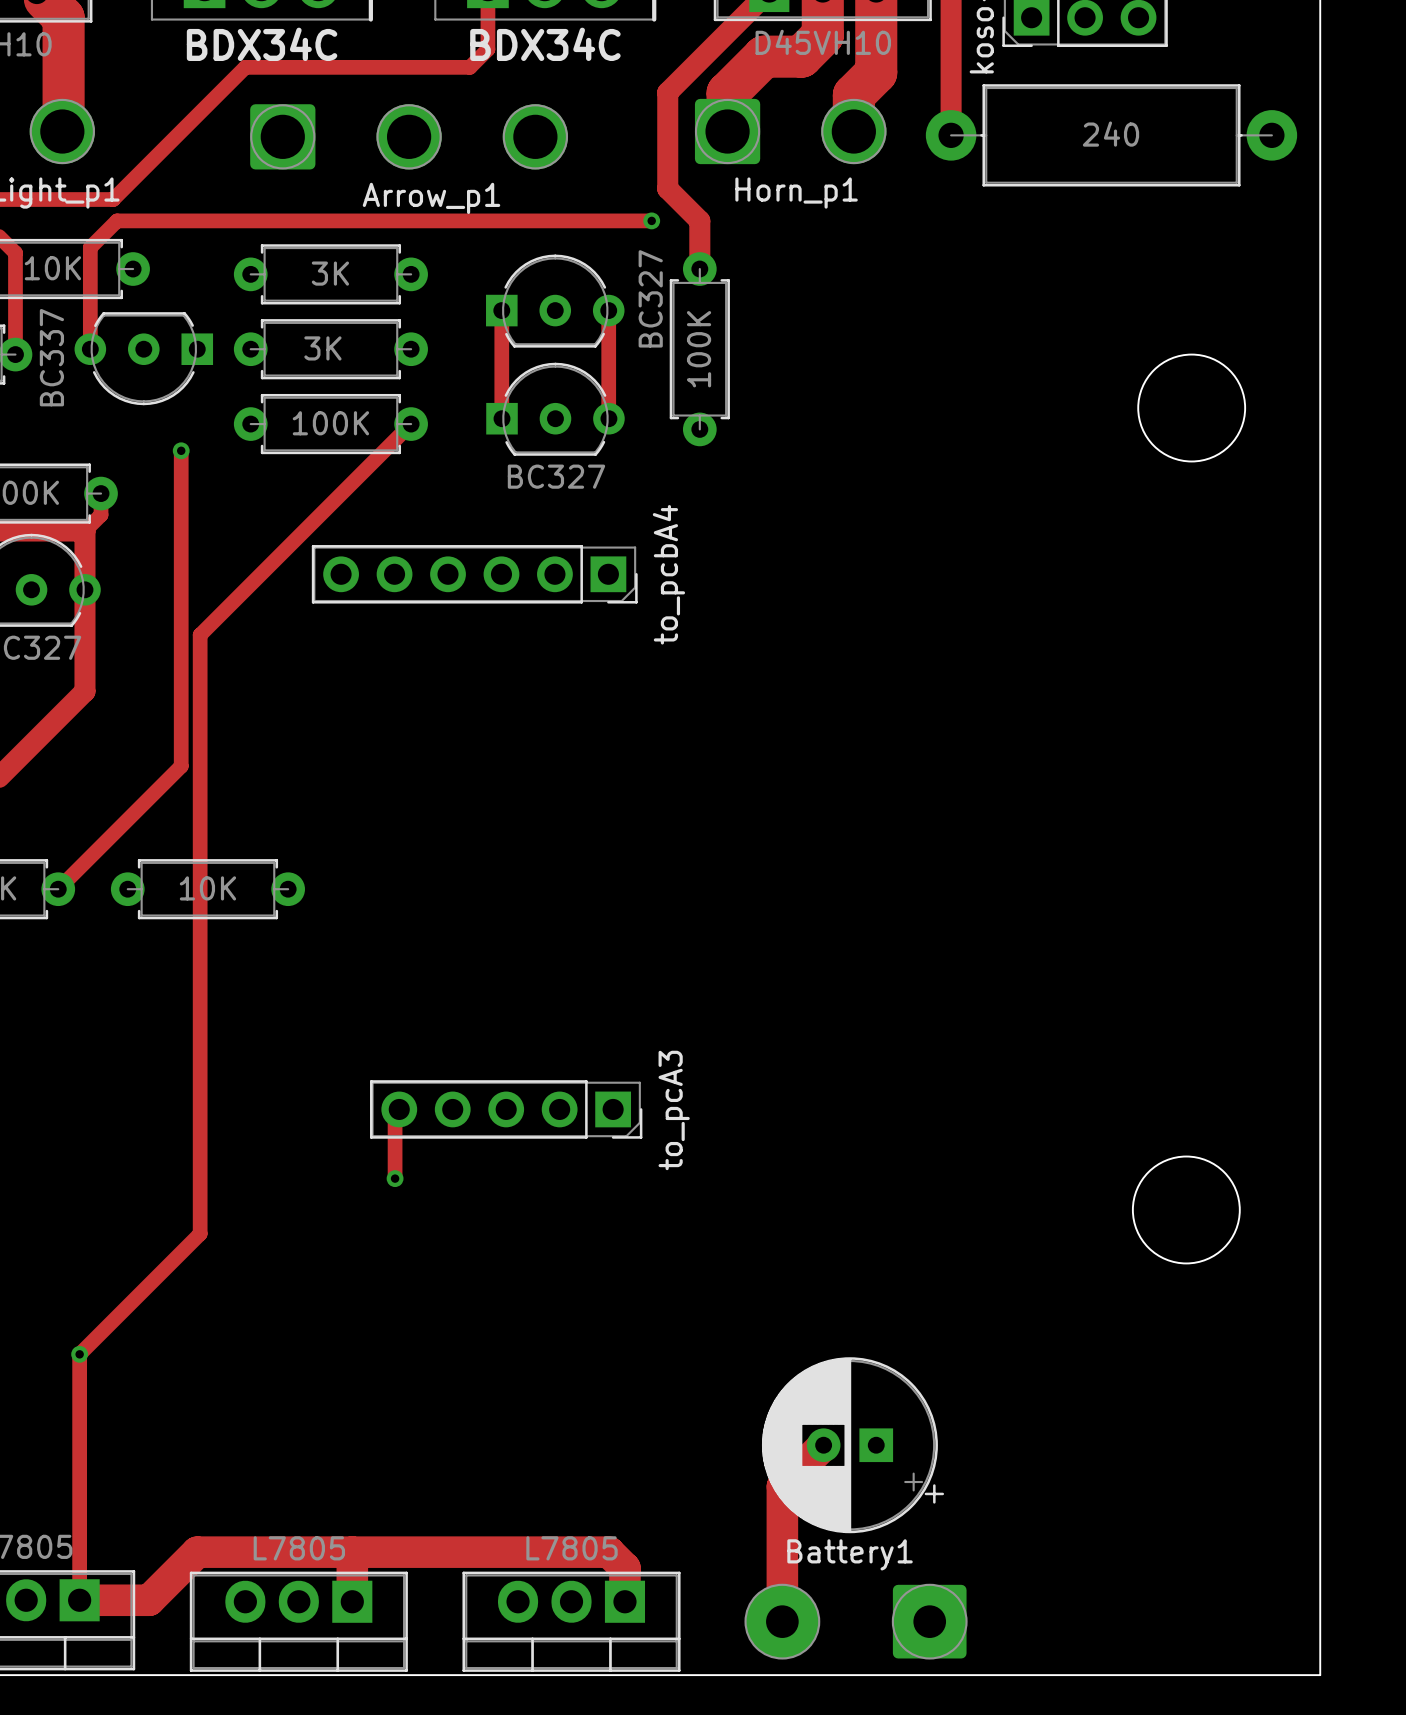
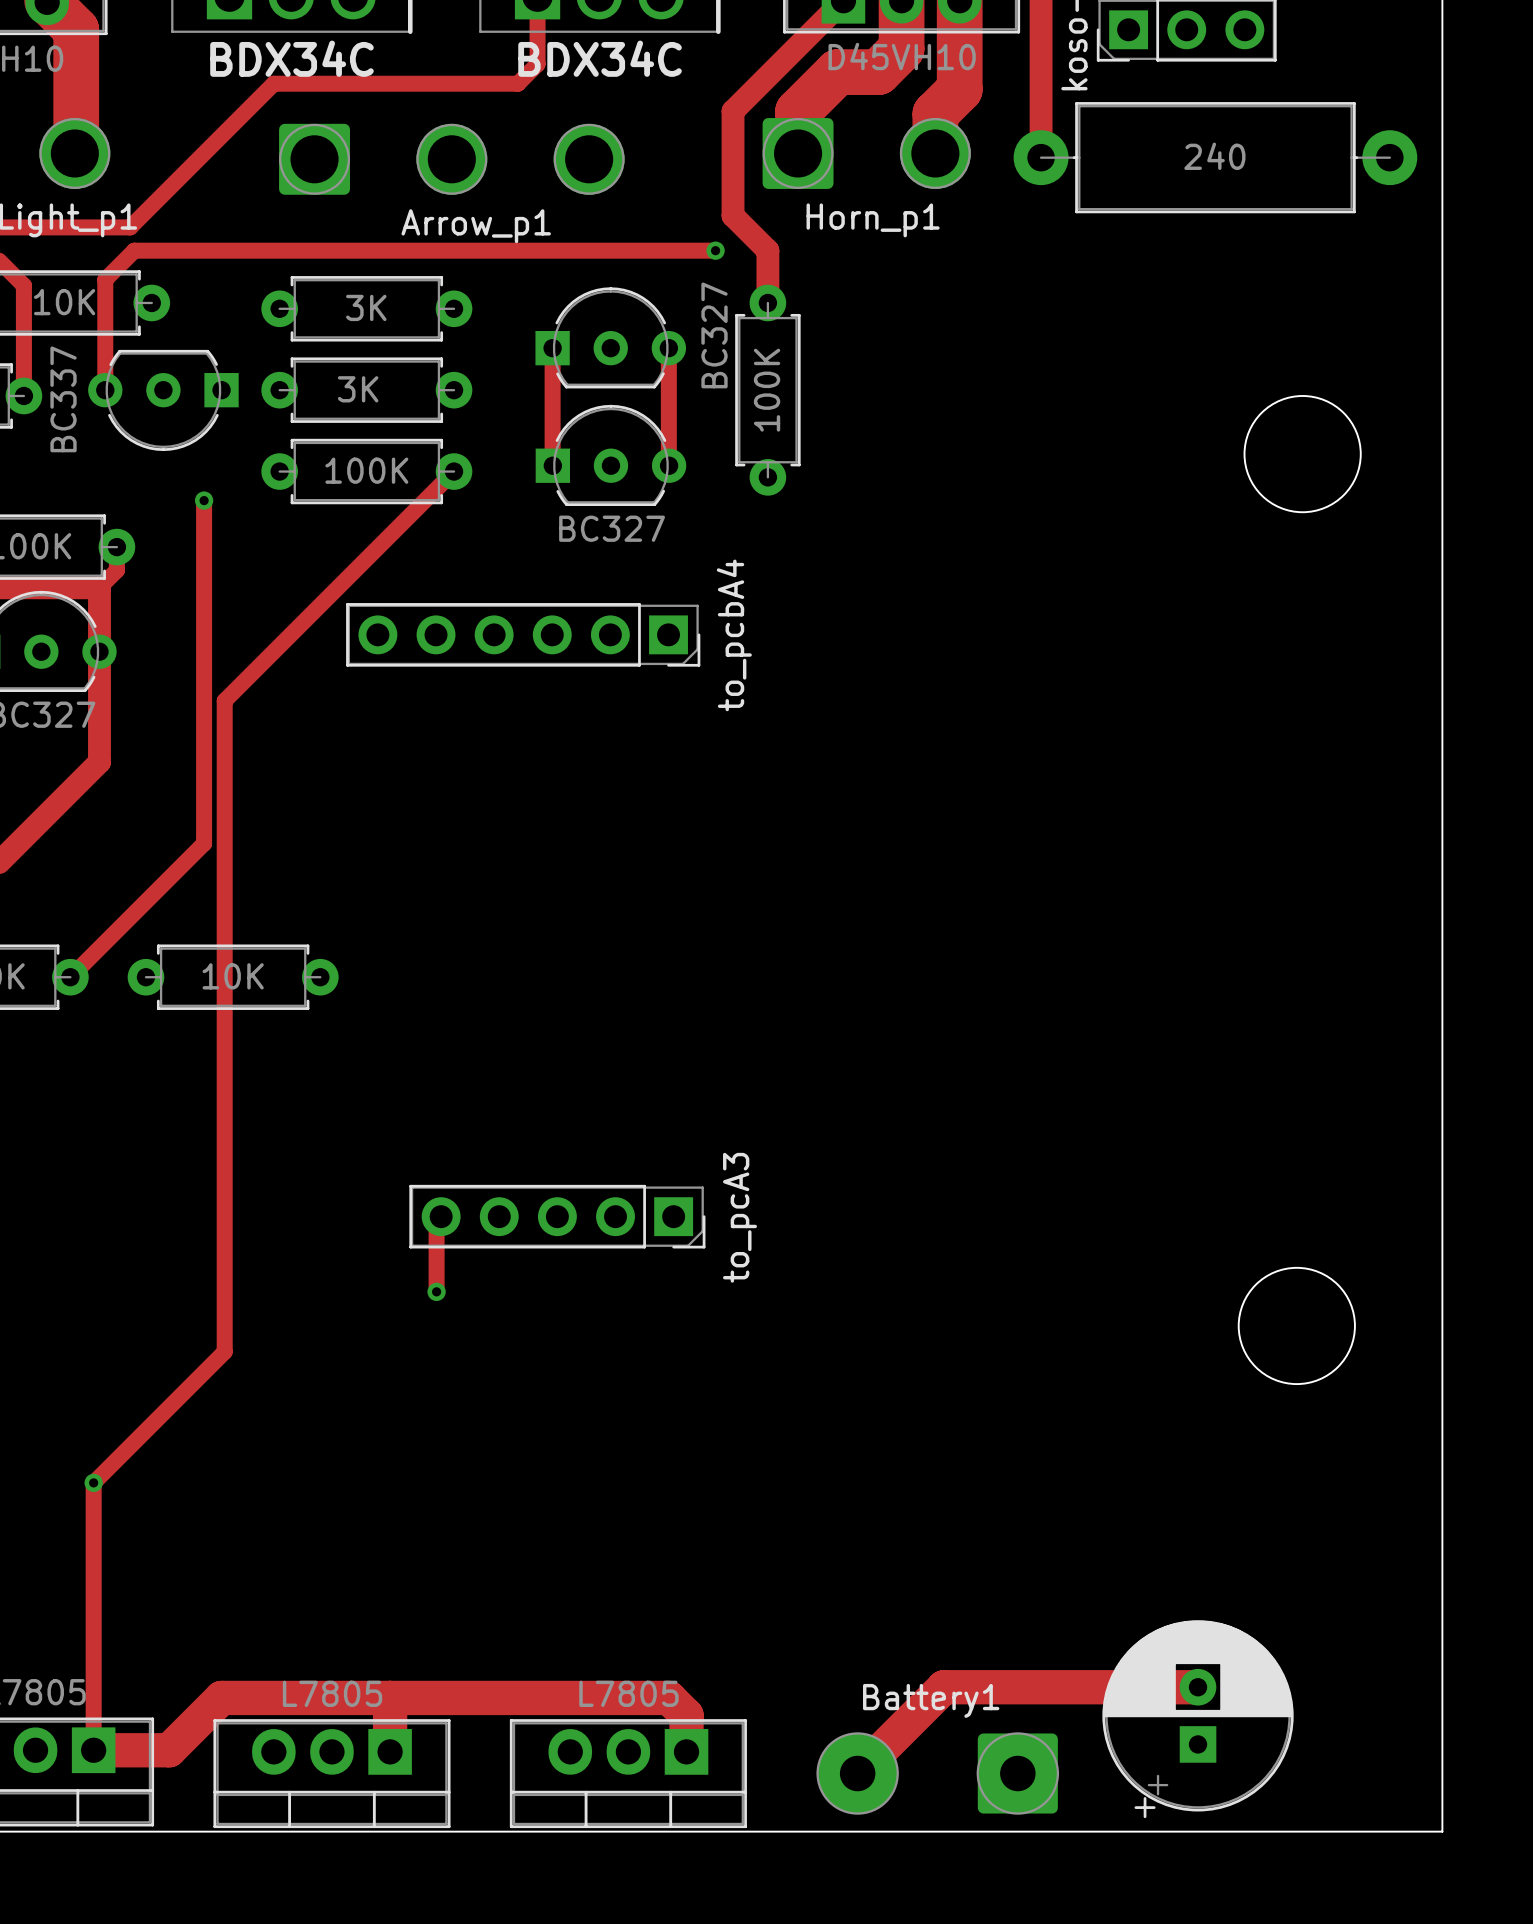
track: (823, 1445) (782, 1486) (782, 1621) -> (1198, 1687) (943, 1687) (857, 1773)
part rotation: 0° (852, 1445) -> 90° clockwise (1198, 1719)
part position: (852, 1445) -> (1198, 1719)

